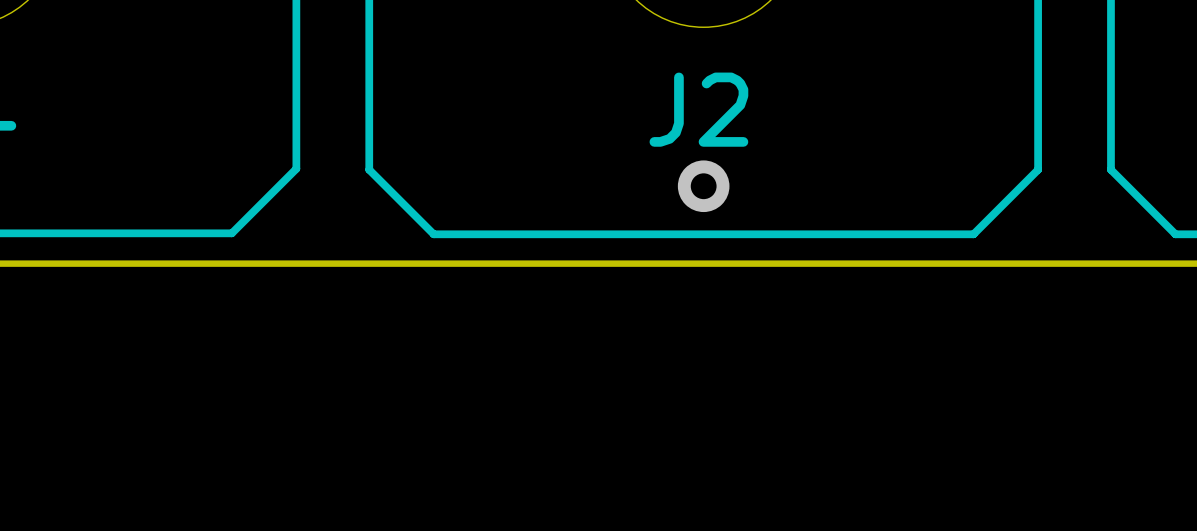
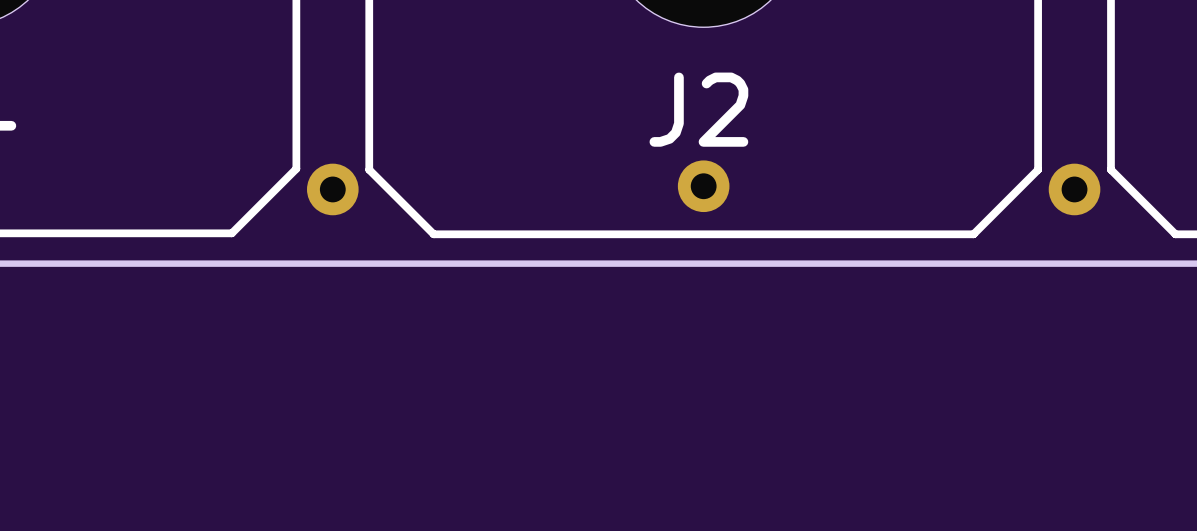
via: none -> (332, 189)
via: none -> (1074, 189)

